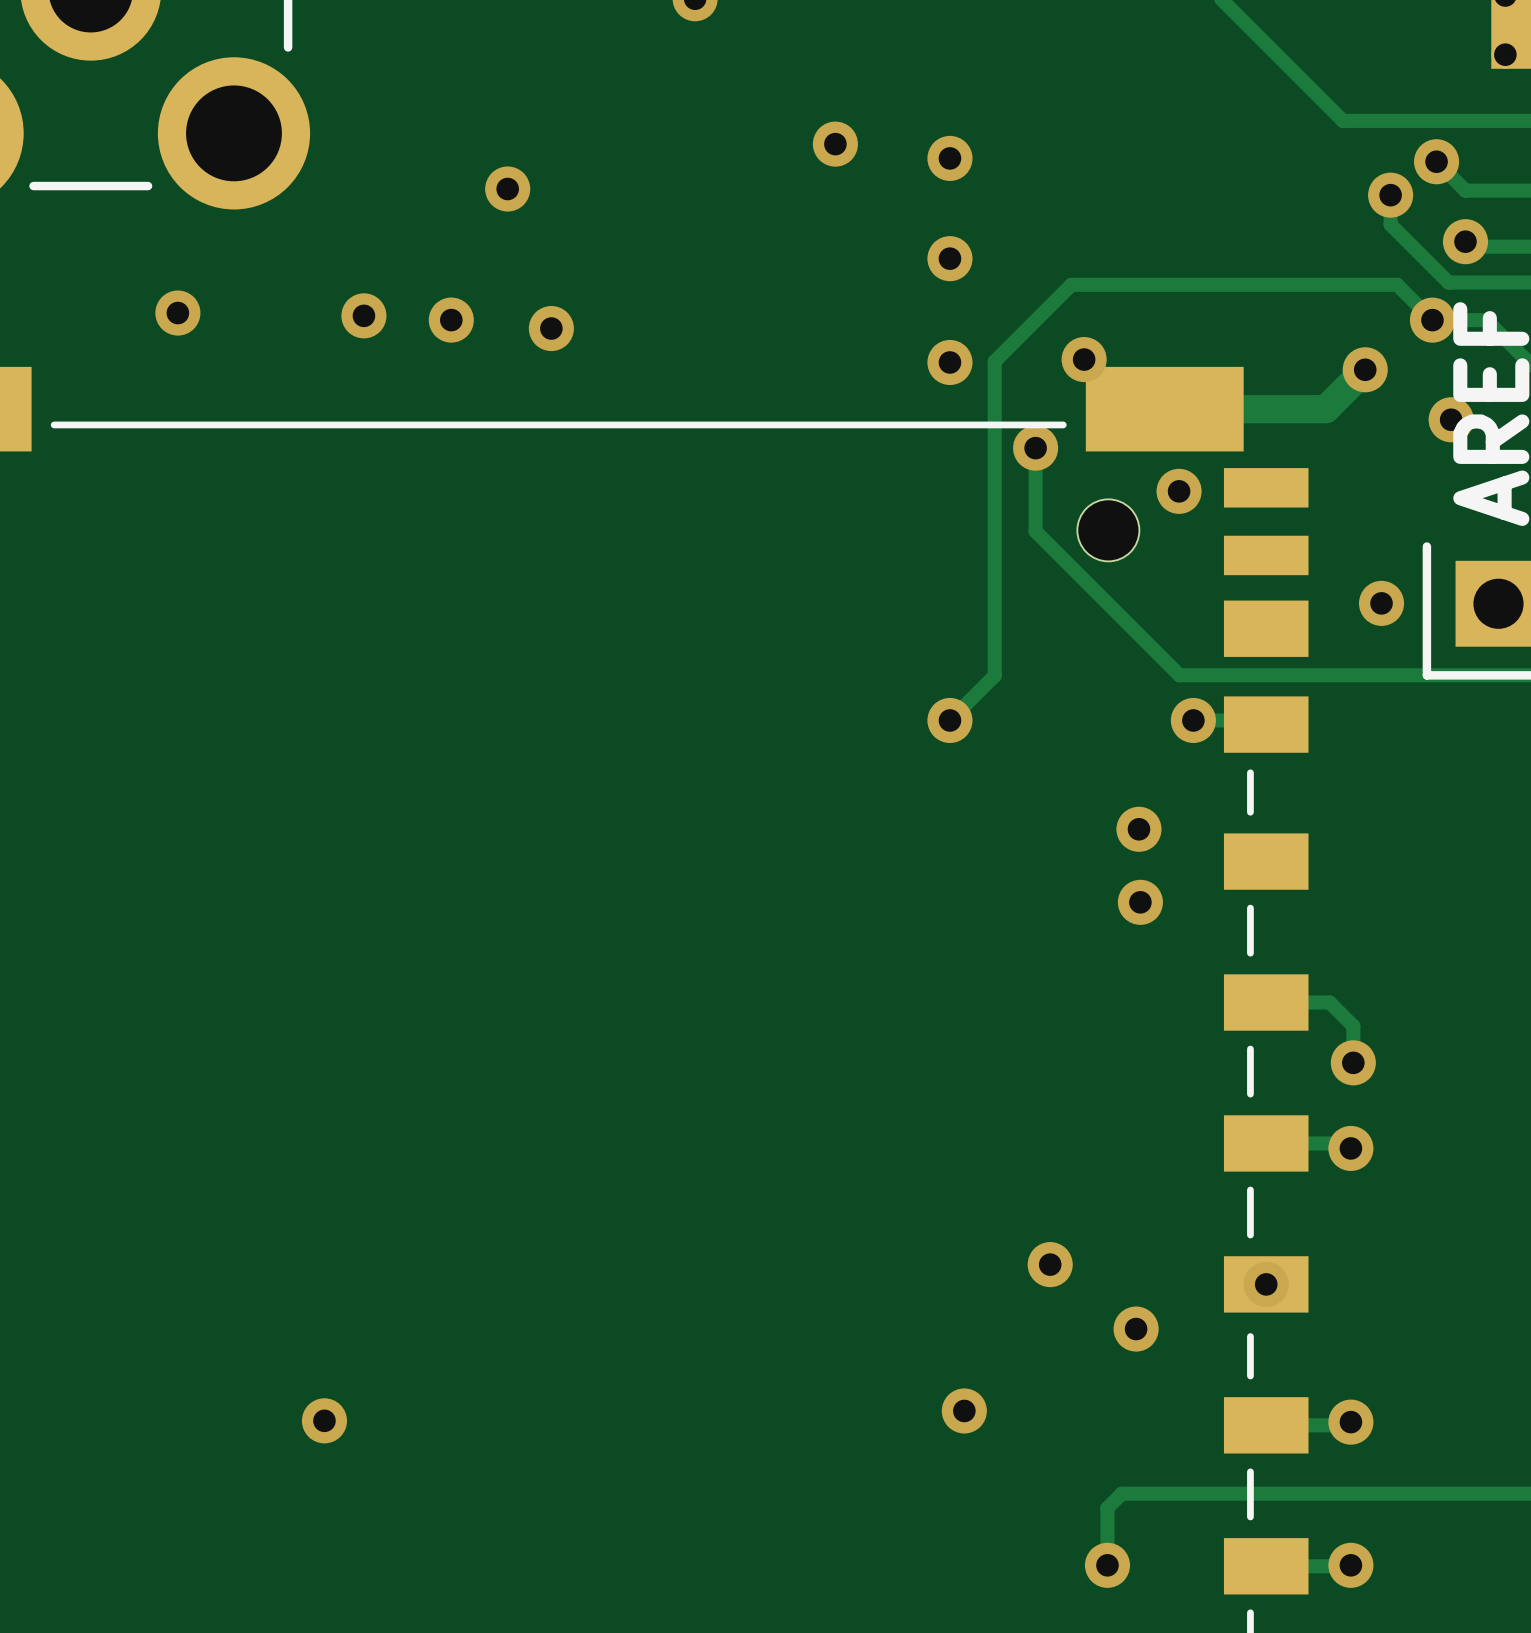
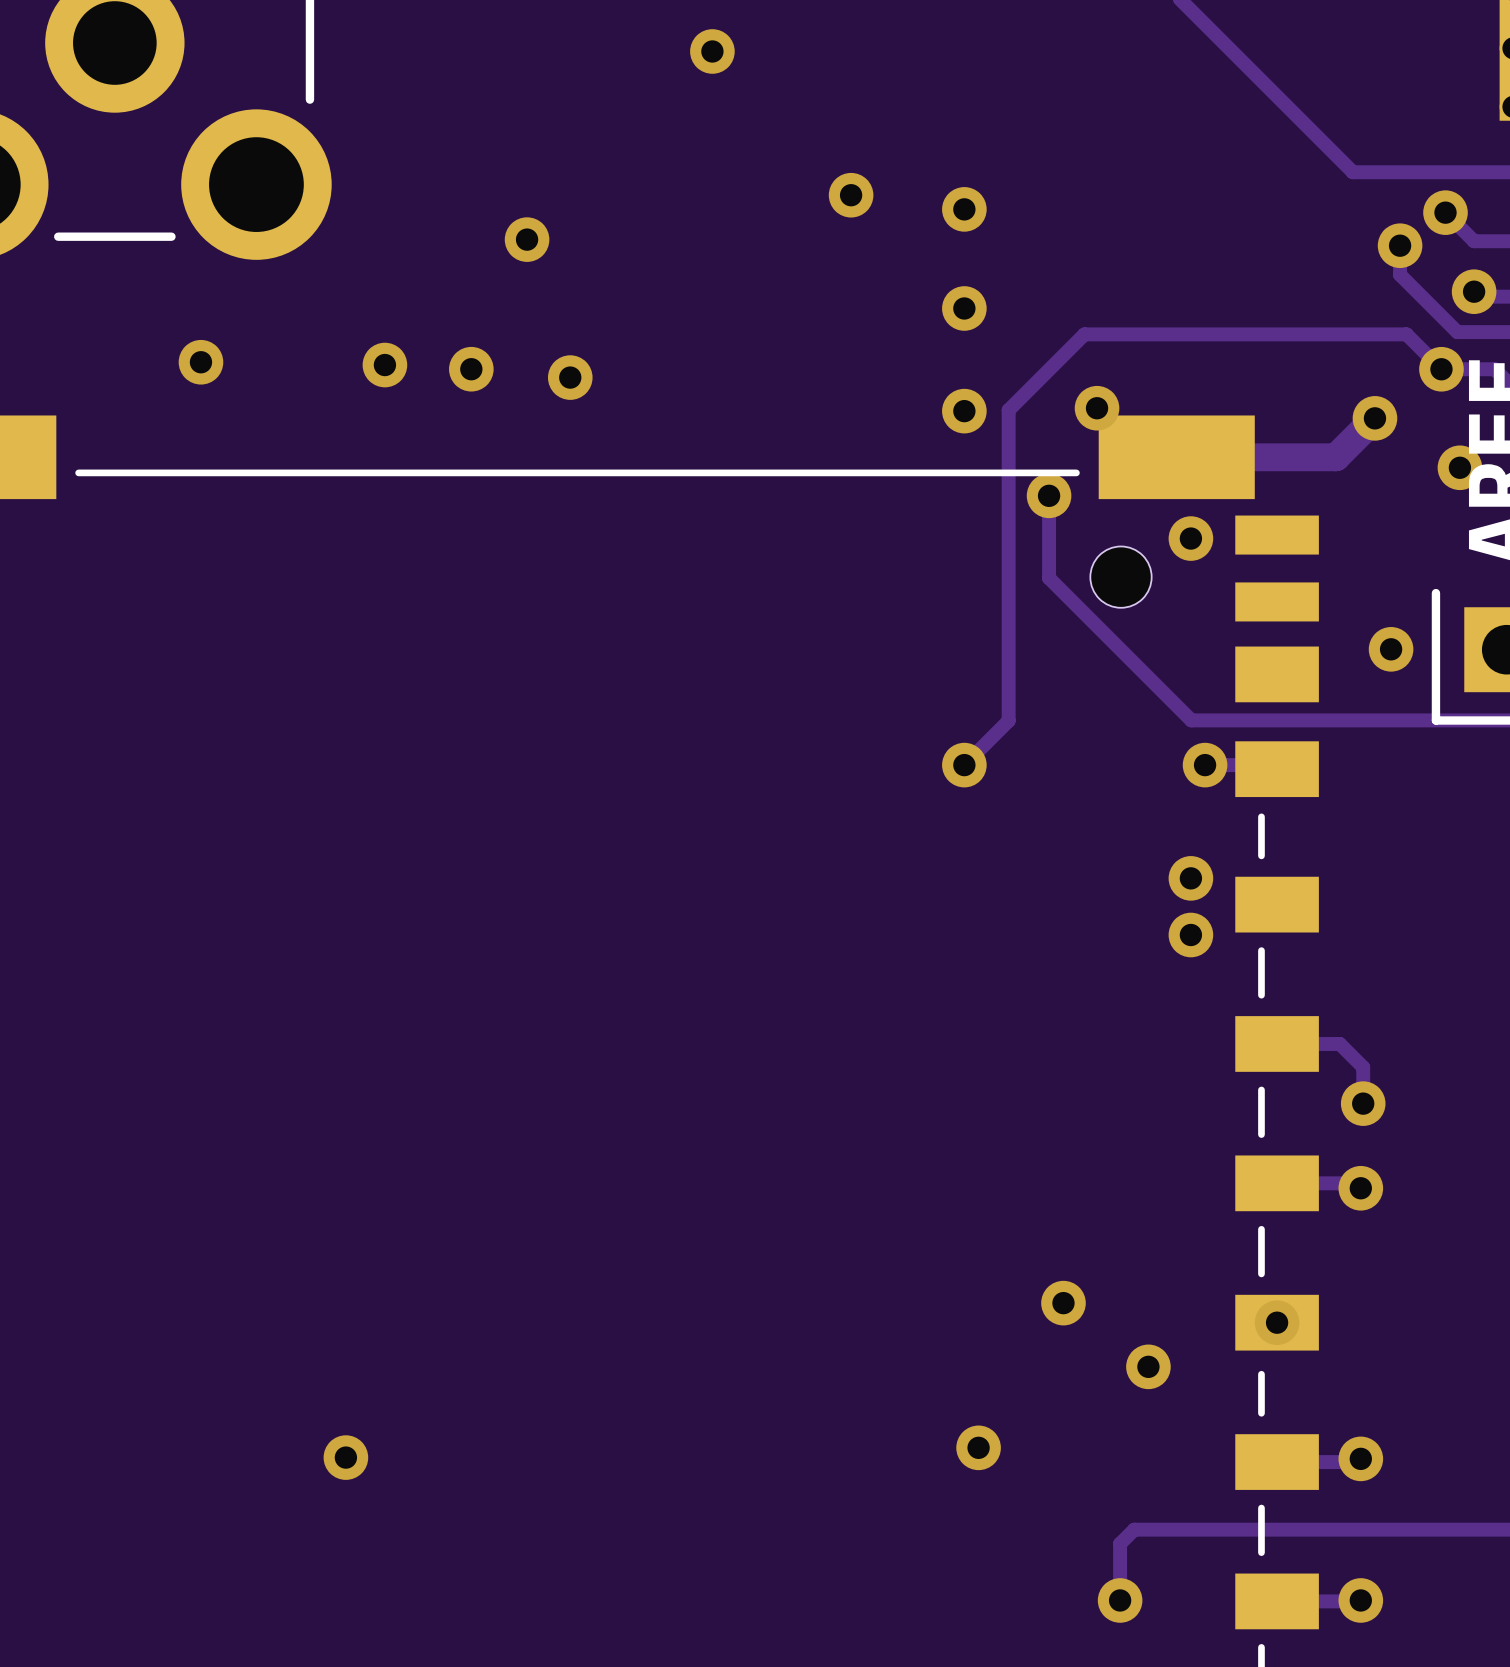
via position: (1138, 829) -> (1190, 878)
via position: (1140, 902) -> (1190, 935)

